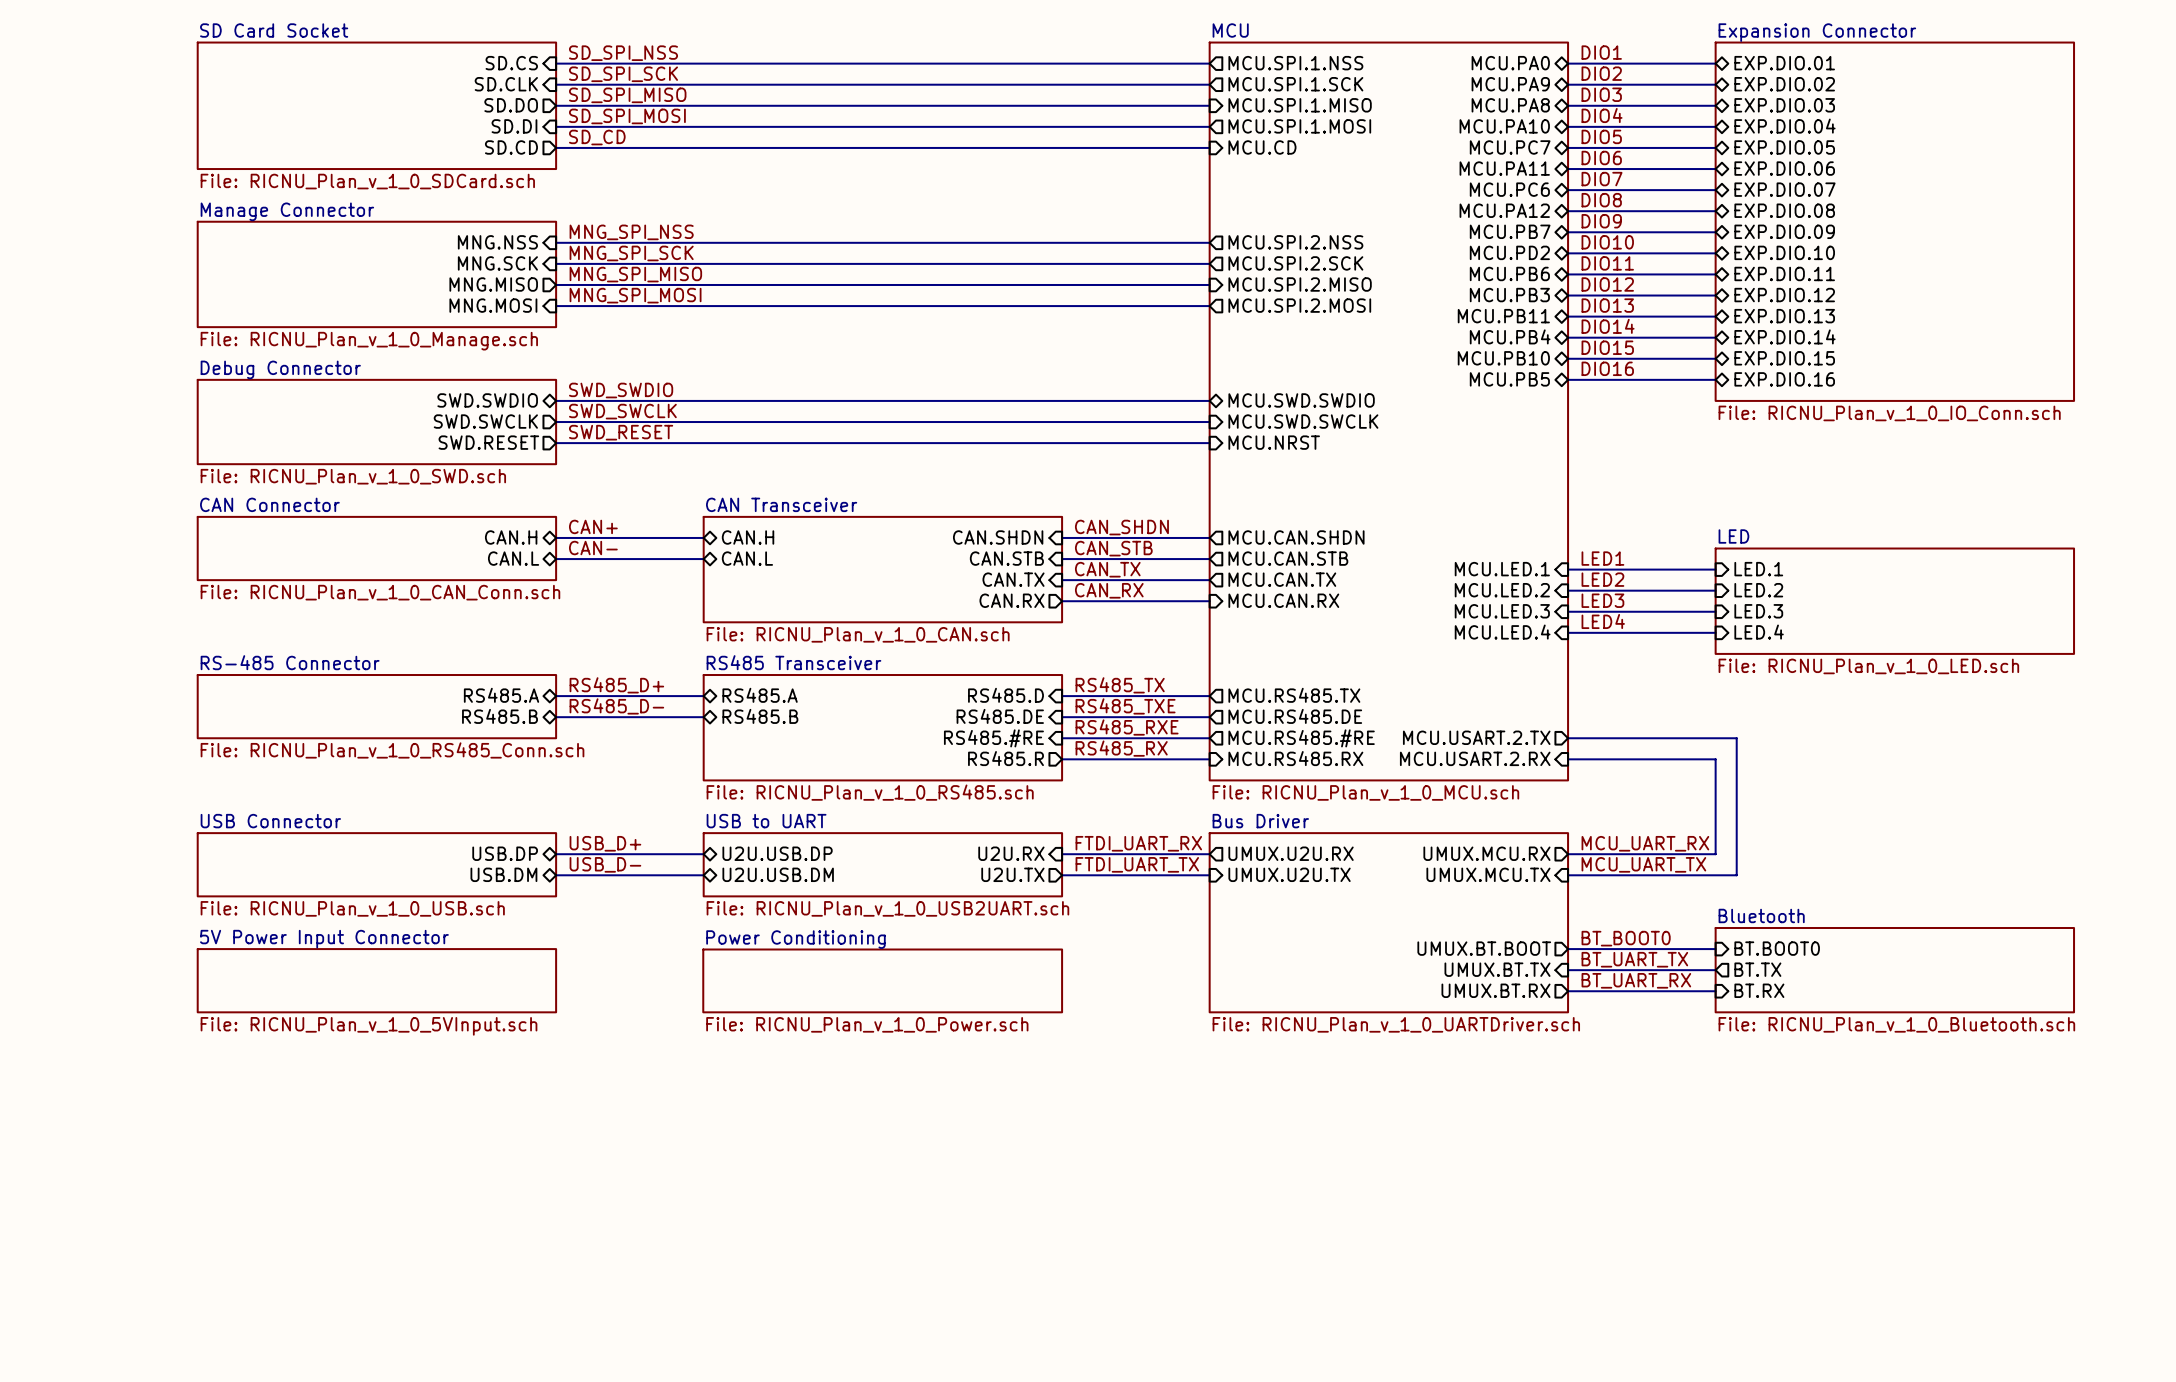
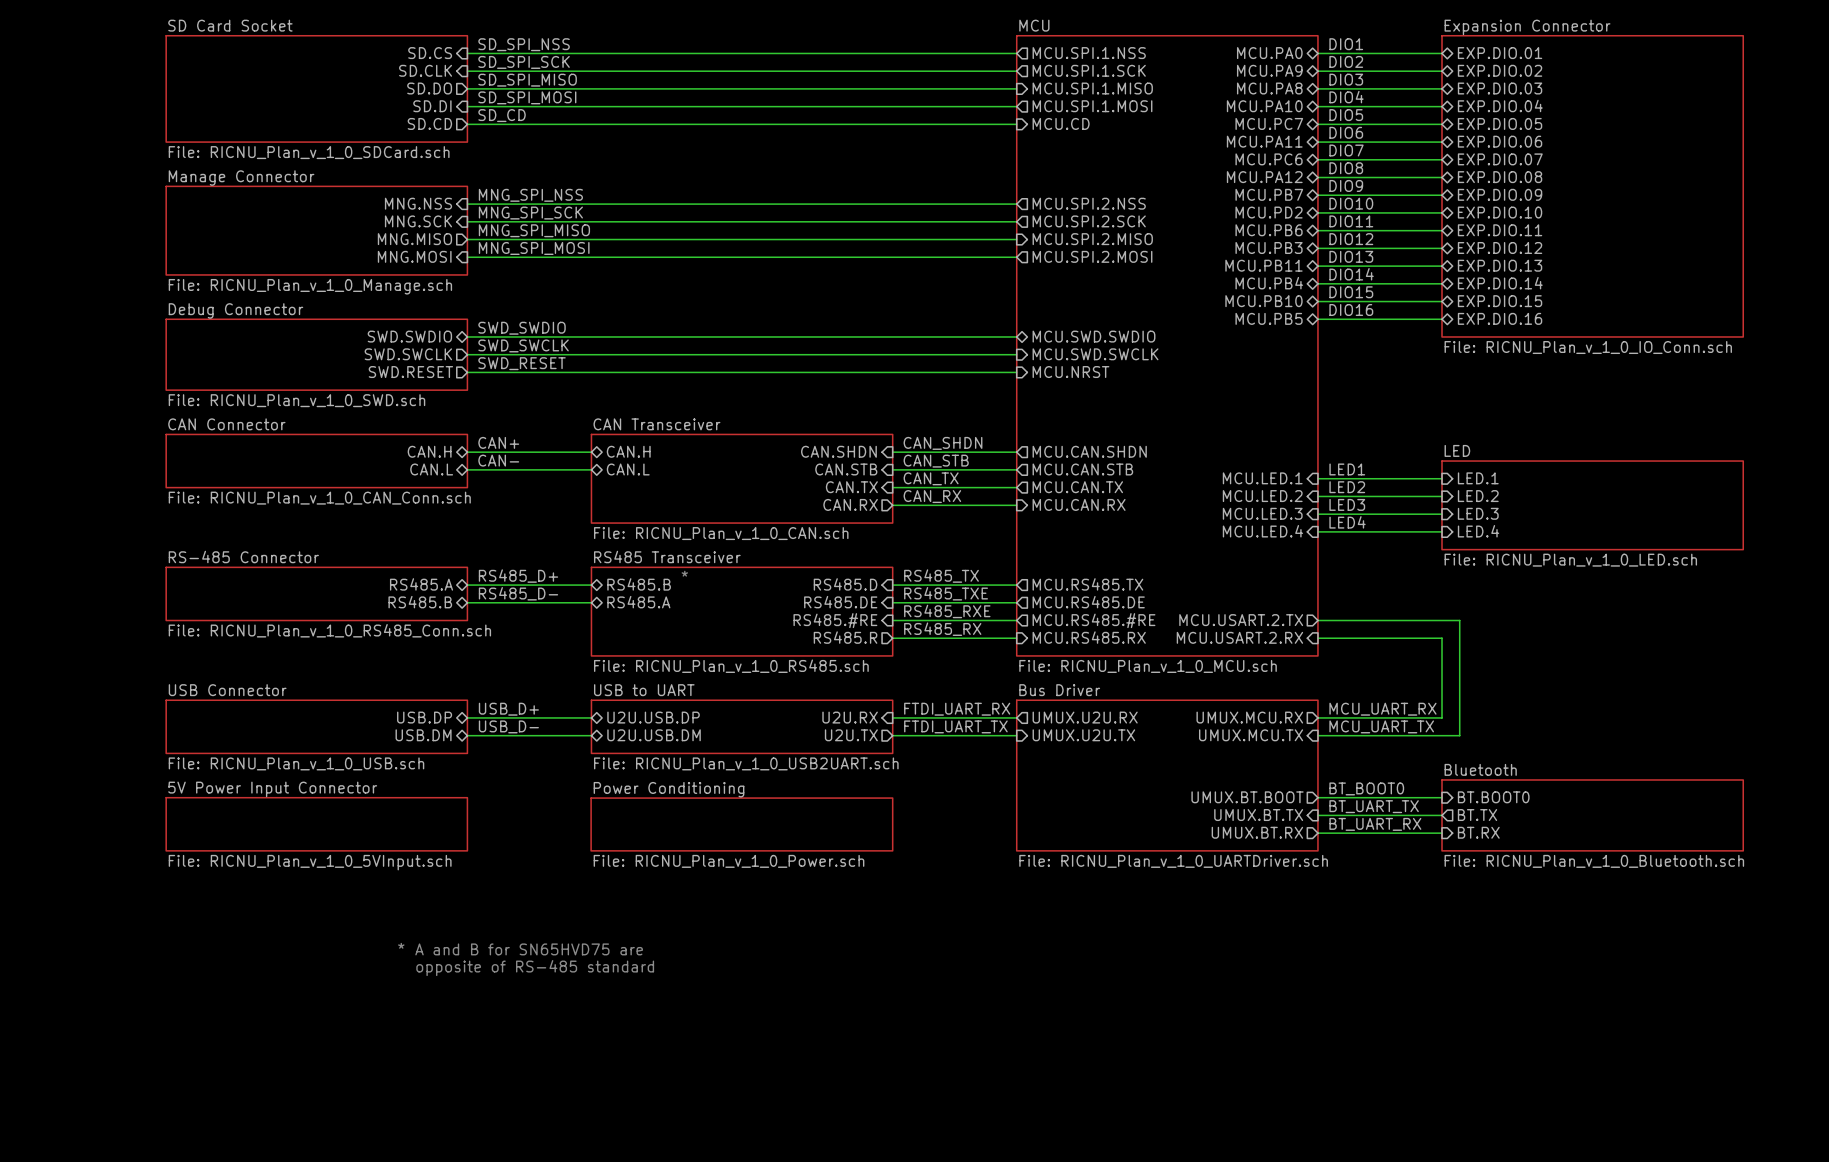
text: none -> * (684, 573)
sheet pin: RS485.A (760, 695) -> RS485.B (639, 584)
sheet pin: RS485.B (760, 716) -> RS485.A (638, 602)
text: none -> * (401, 945)
text: none -> A and B for SN65HVD75 are (529, 949)
text: none -> opposite of RS-485 standard (535, 968)

